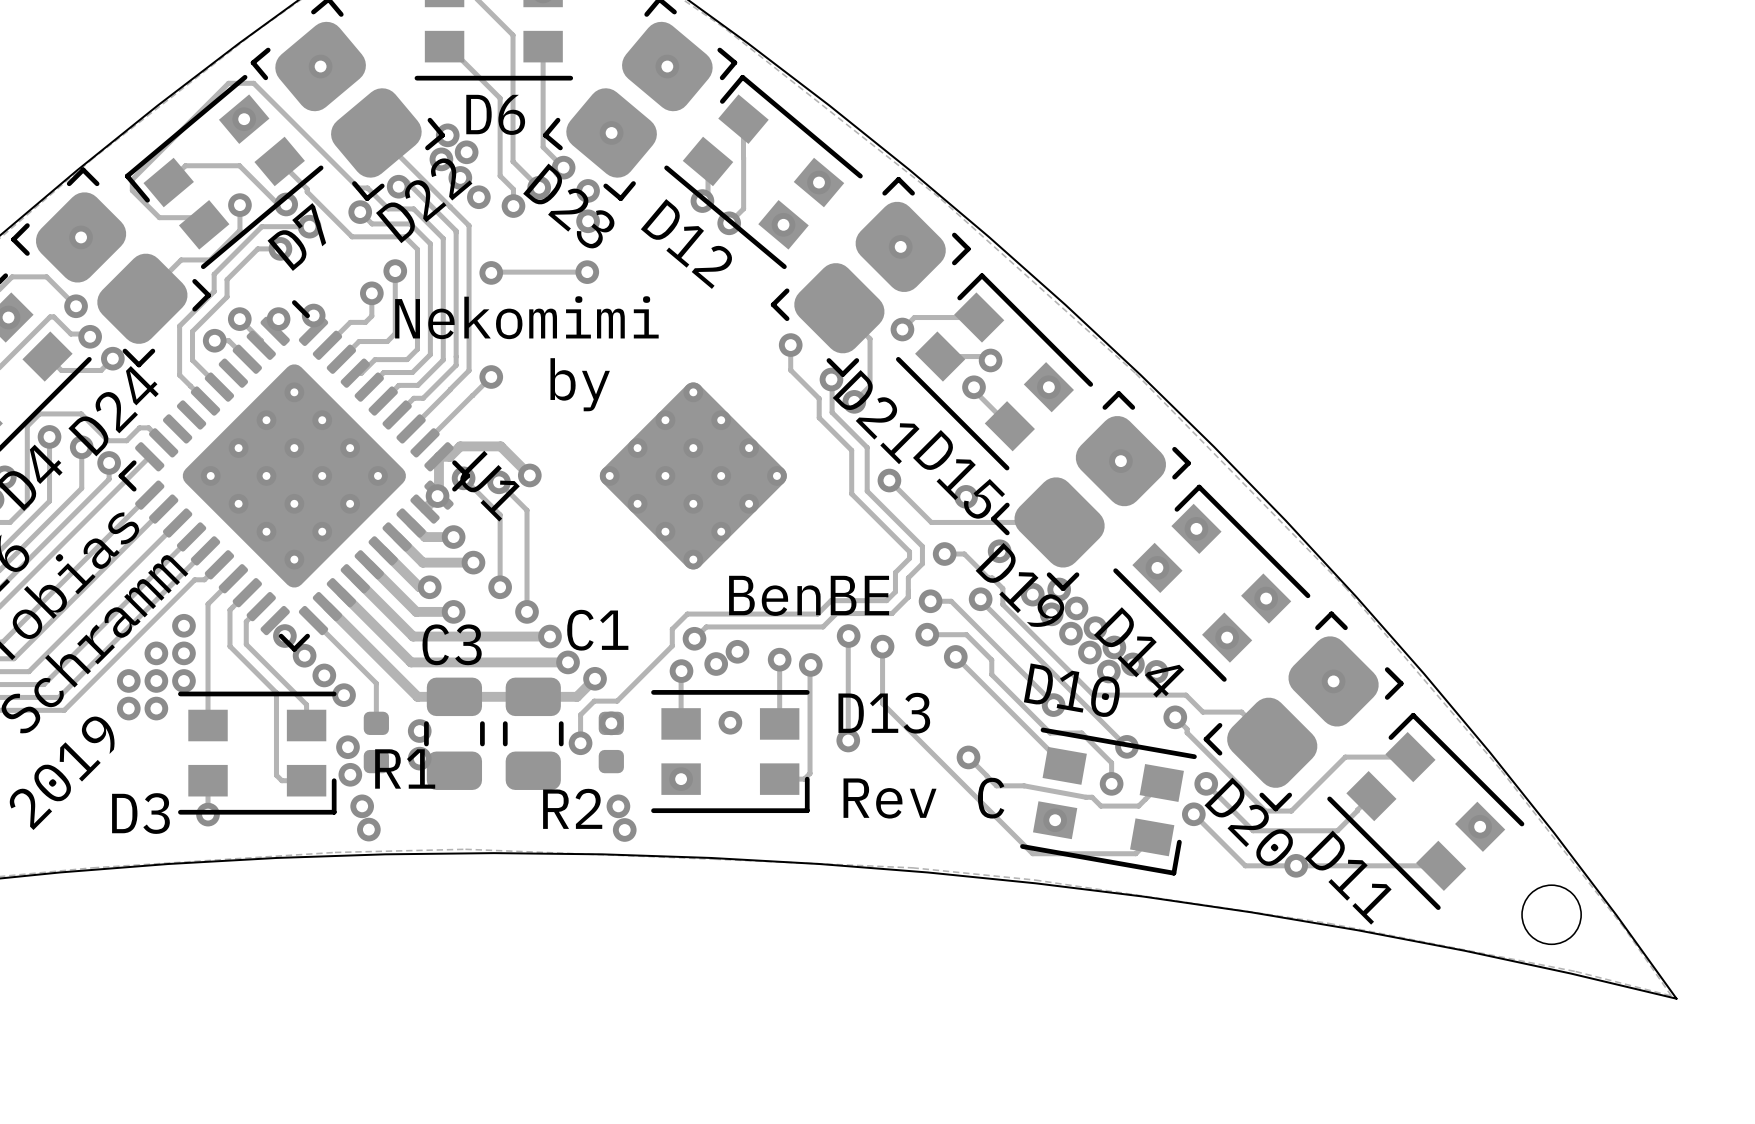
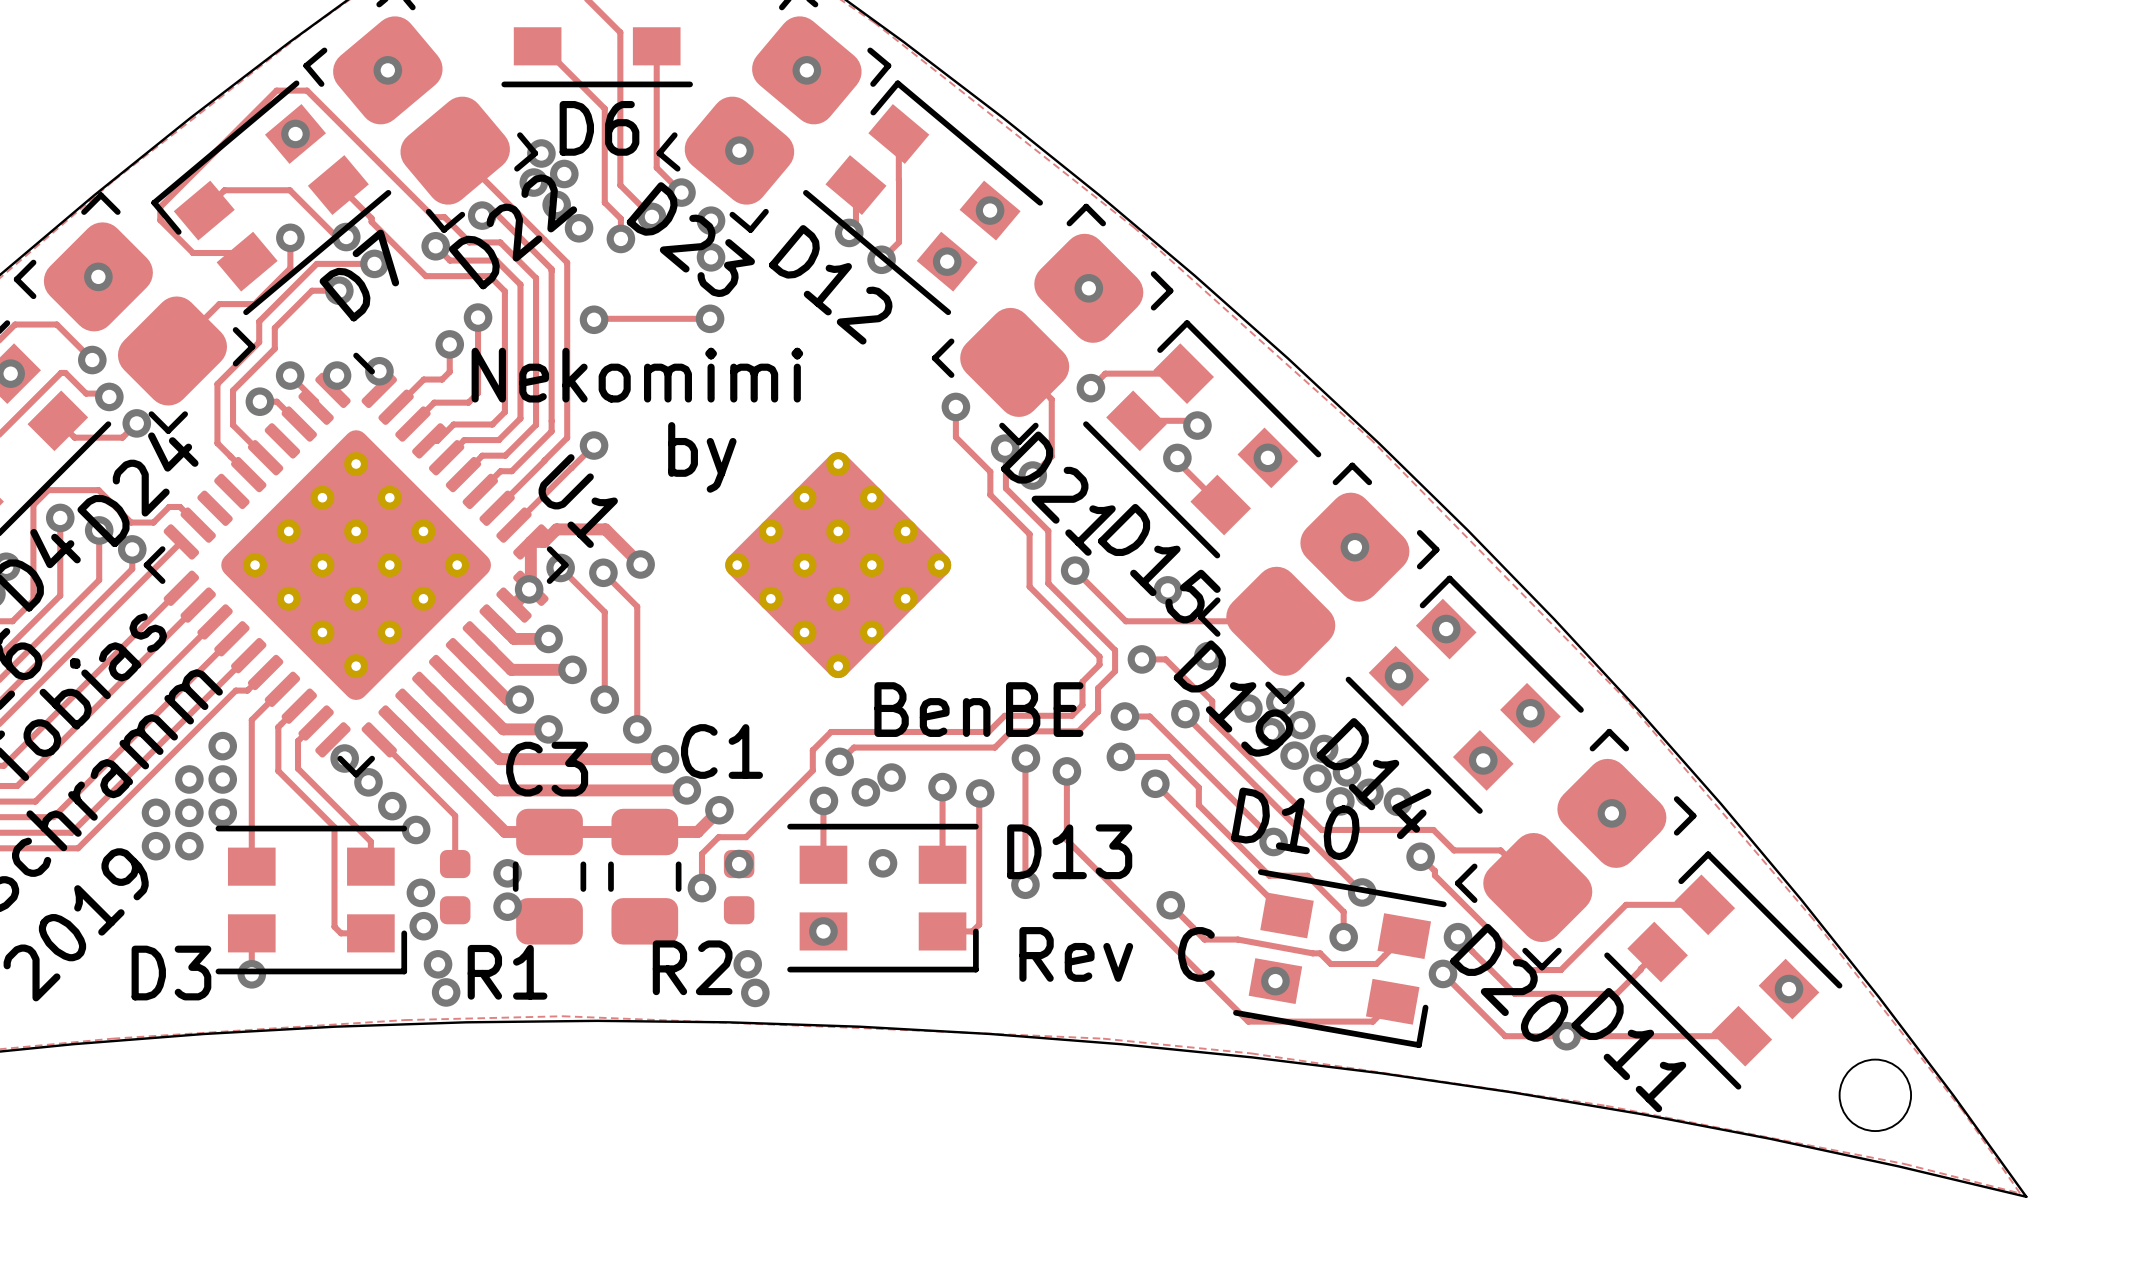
U1 name position: U1 (489, 486) -> U1 (578, 501)
R1 name position: R1 (405, 768) -> R1 (507, 972)

